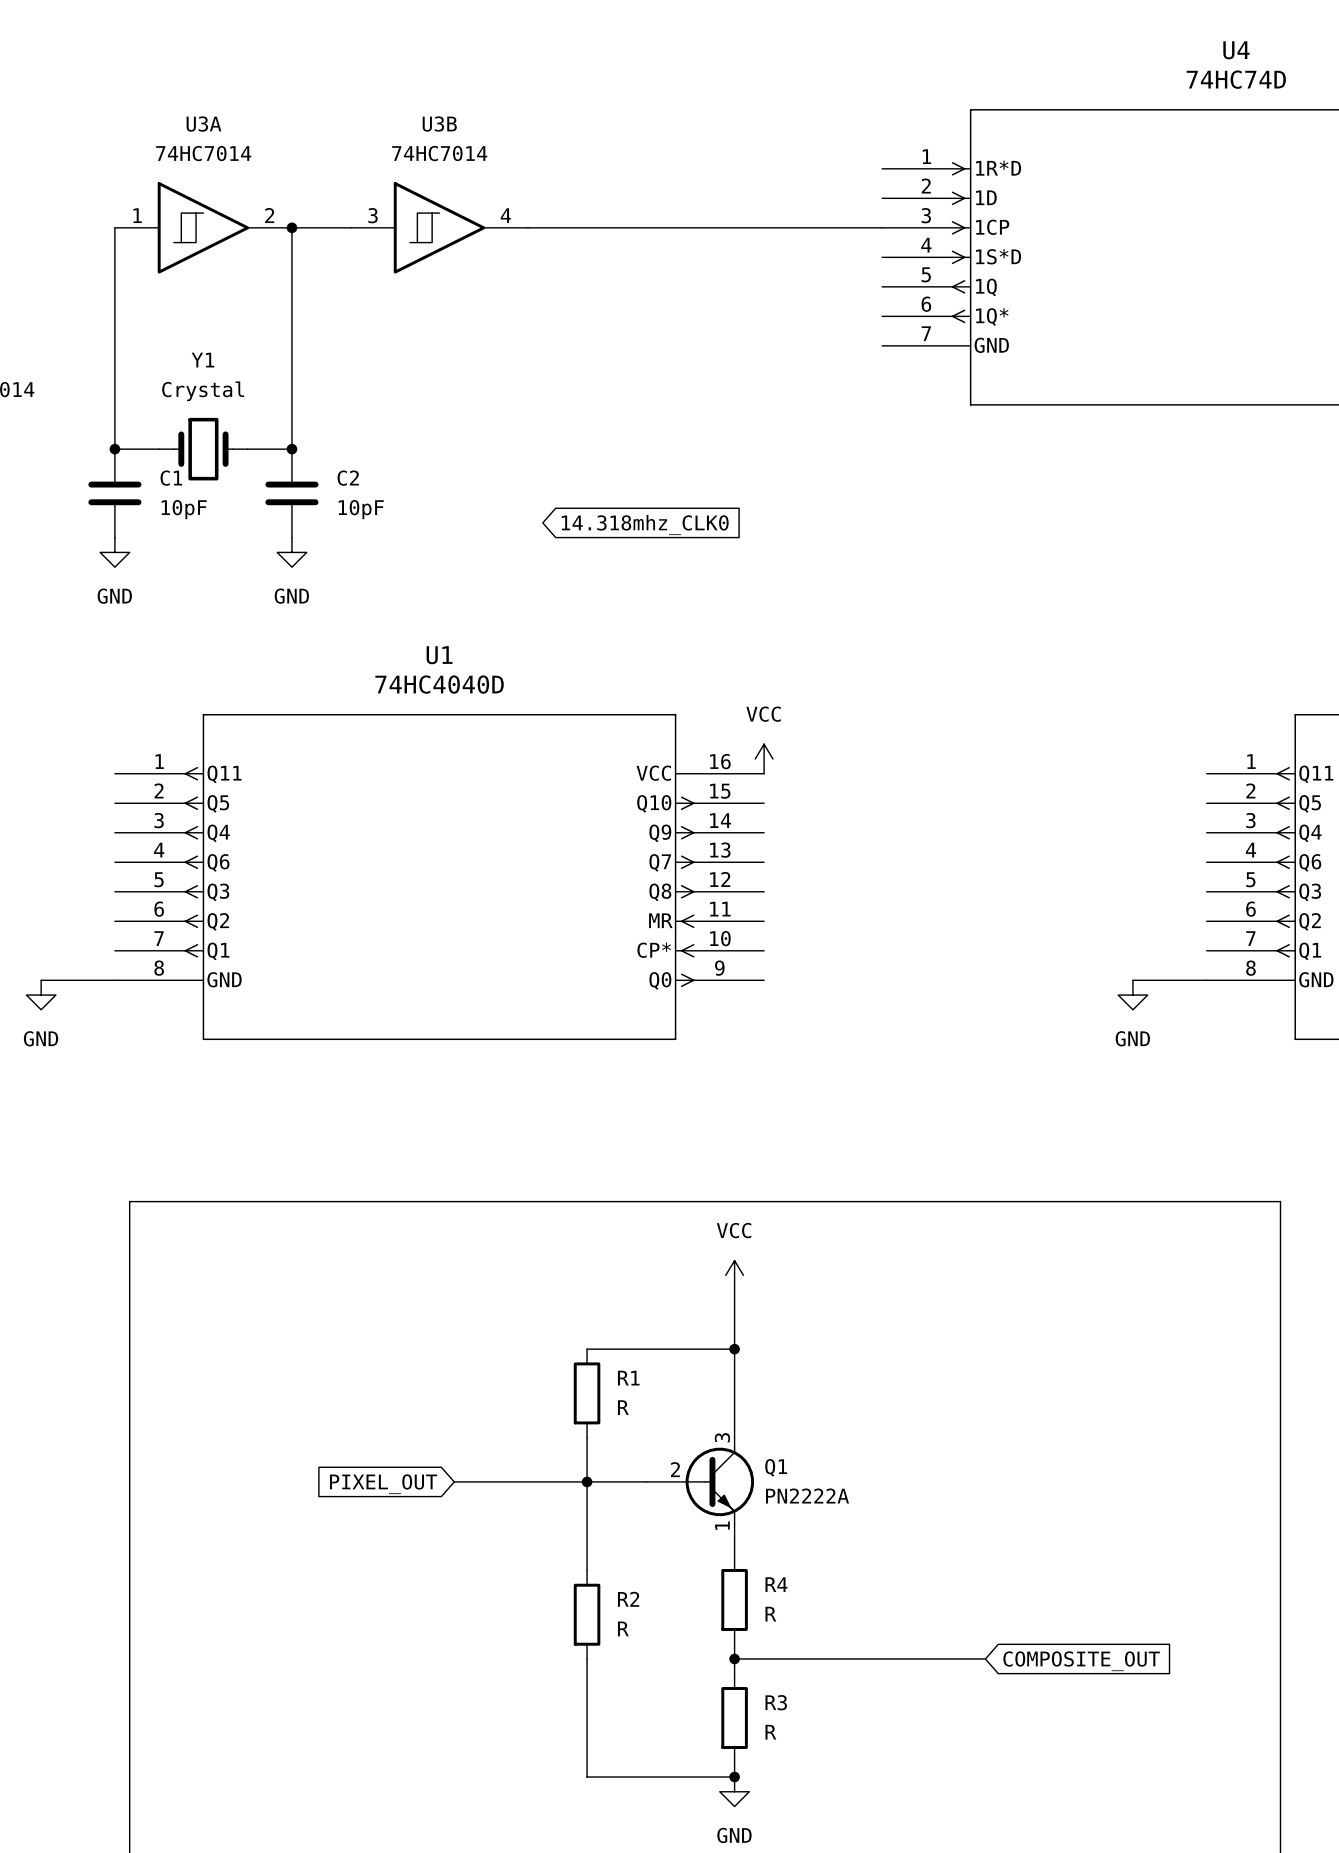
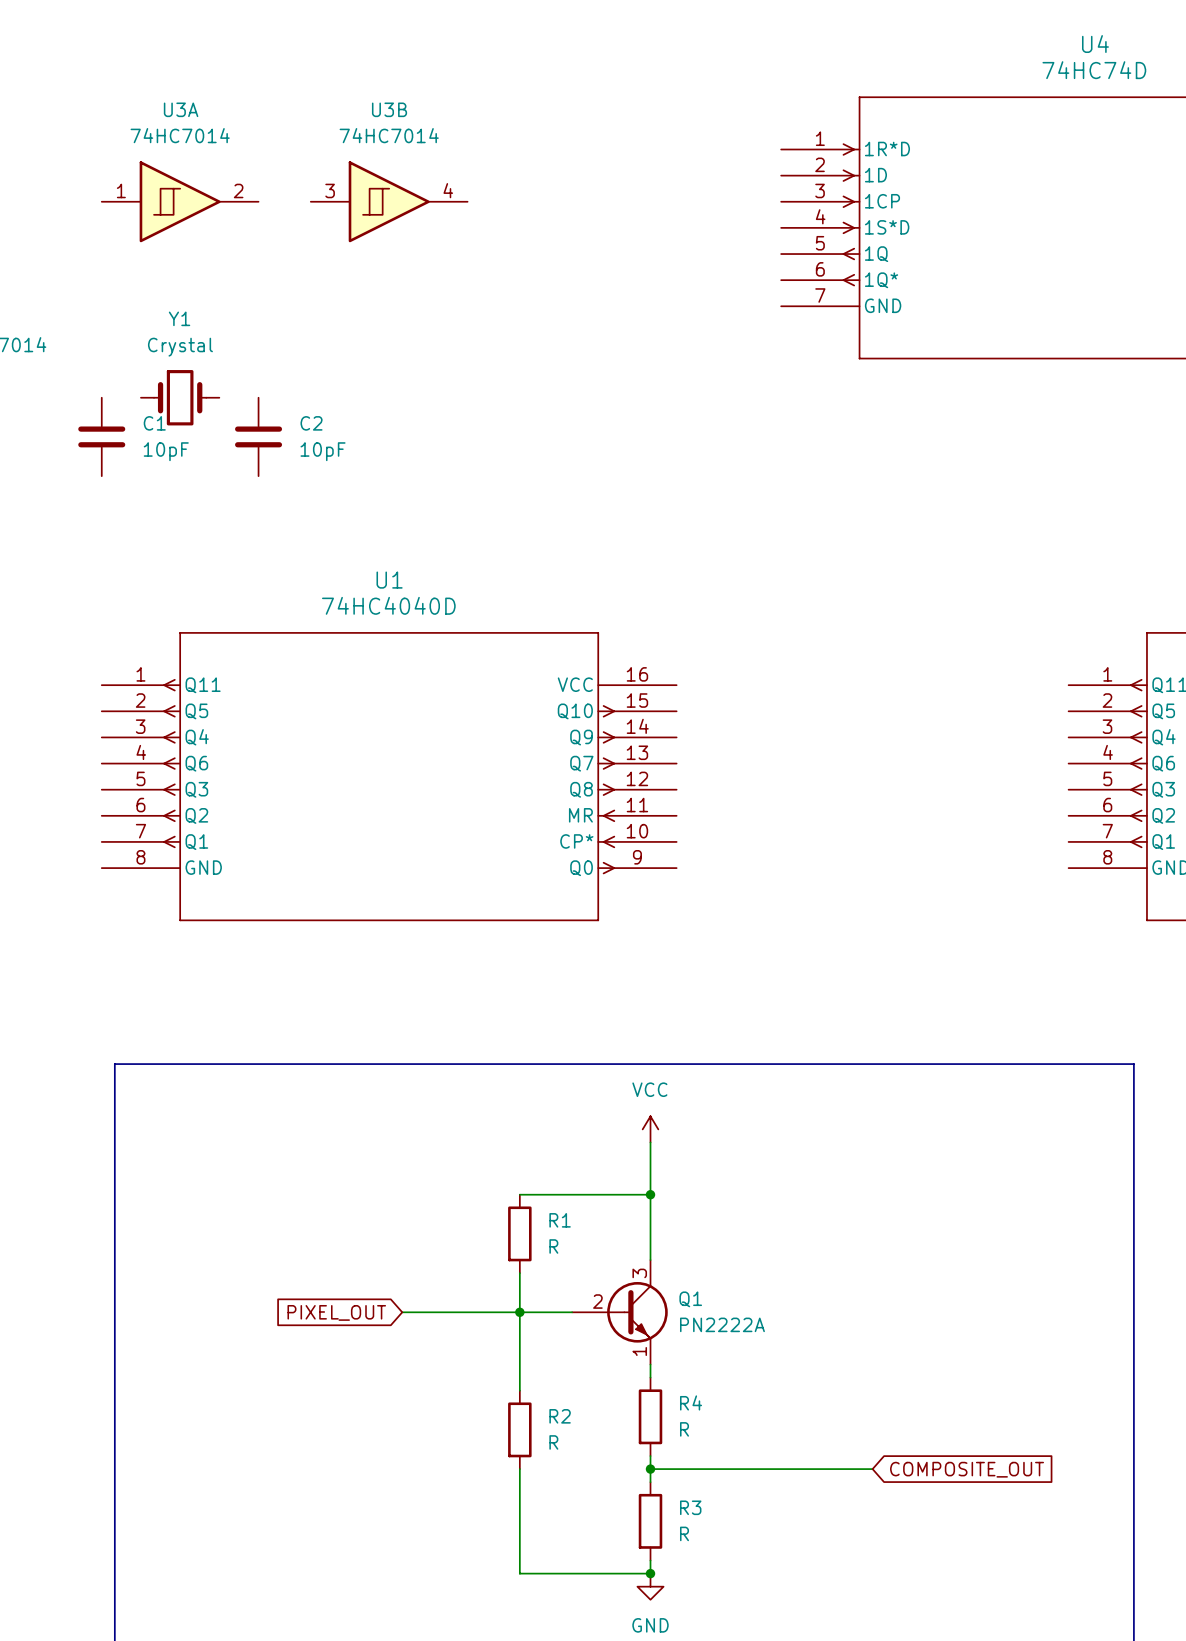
wire: (114, 227) (114, 449) (159, 449) -> none
junction: (291, 227) -> none
wire: (350, 227) (291, 227) (291, 449) (247, 449) -> none
wire: (528, 227) (882, 227) -> none
junction: (114, 449) -> none
junction: (291, 449) -> none
global label: 14.318mhz_CLK0 (645, 524) -> none
power symbol: GND (114, 552) -> none
power symbol: GND (291, 552) -> none
power symbol: VCC (764, 758) -> none
wire: (41, 980) (114, 980) -> none
wire: (1132, 980) (1206, 980) -> none
power symbol: GND (41, 995) -> none
power symbol: GND (1132, 995) -> none

